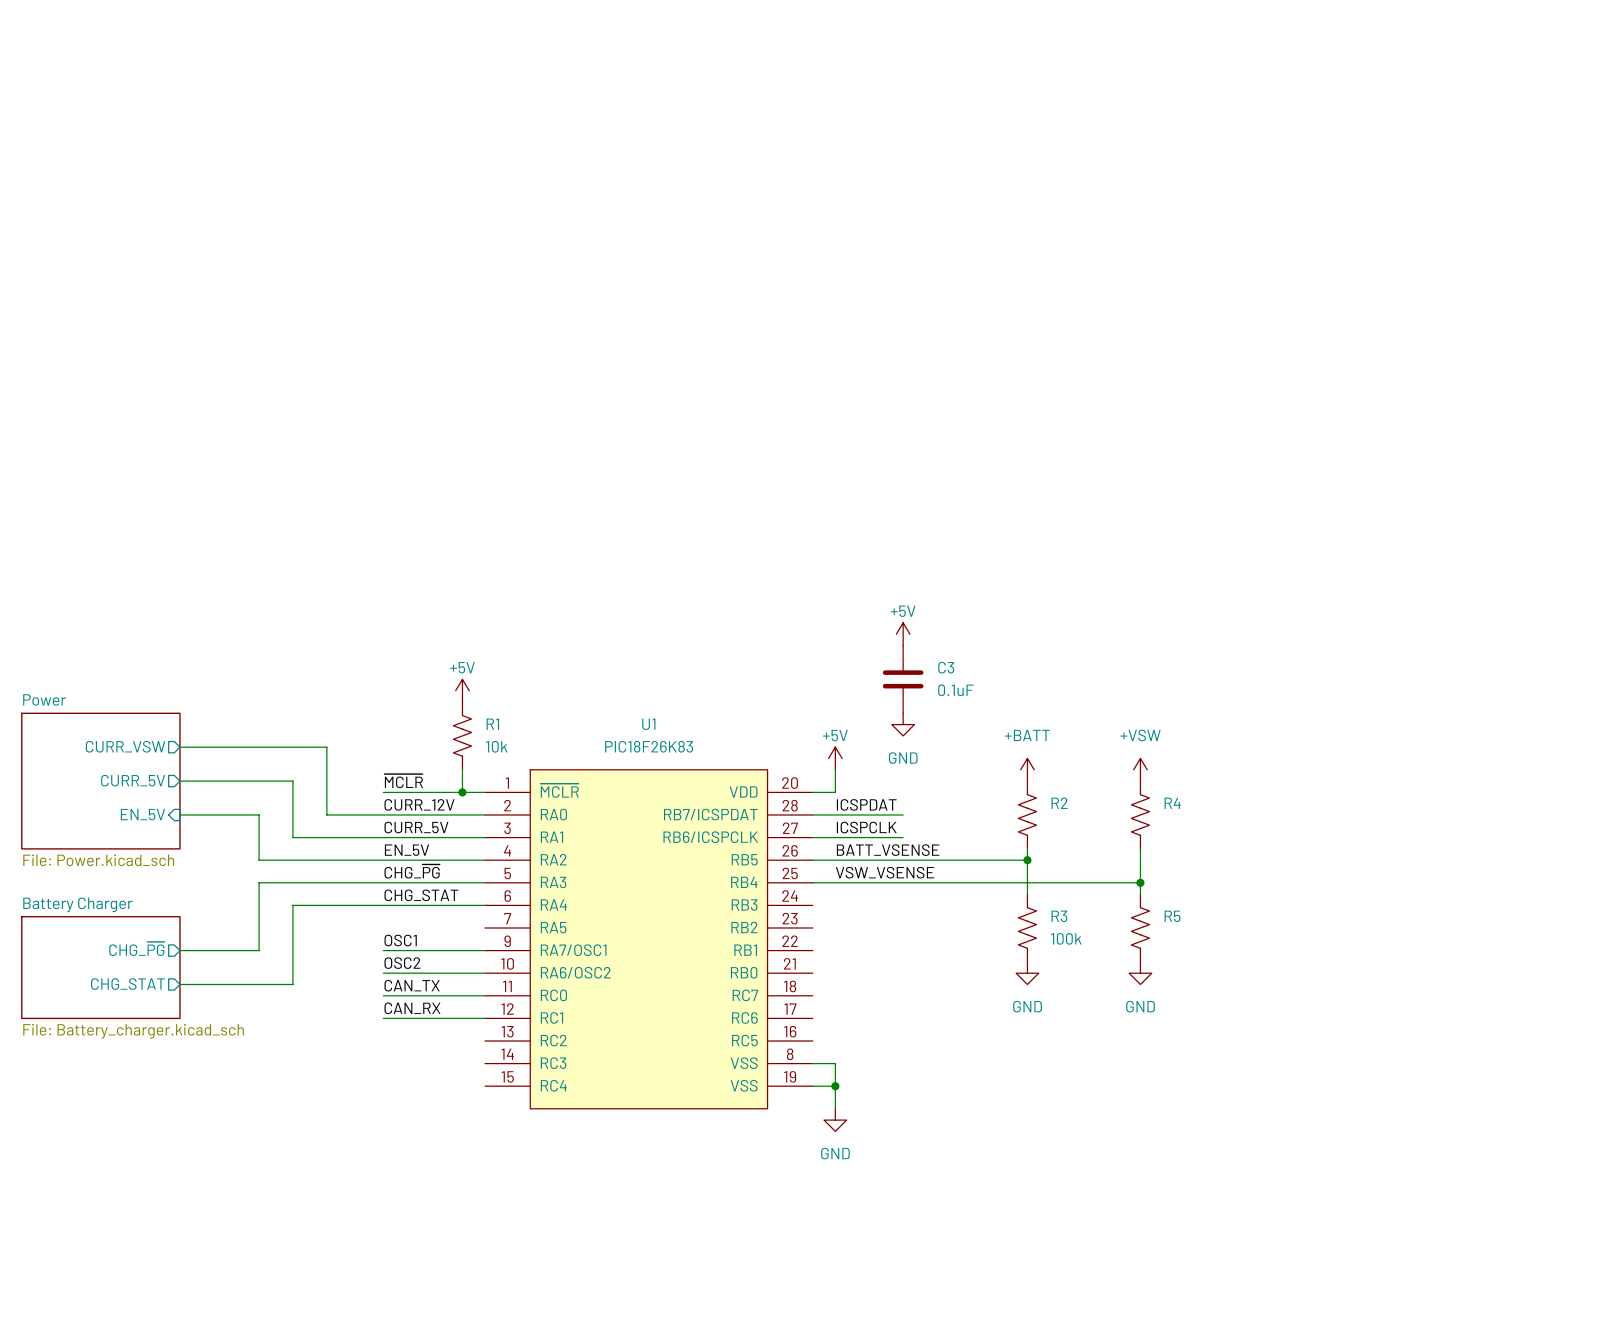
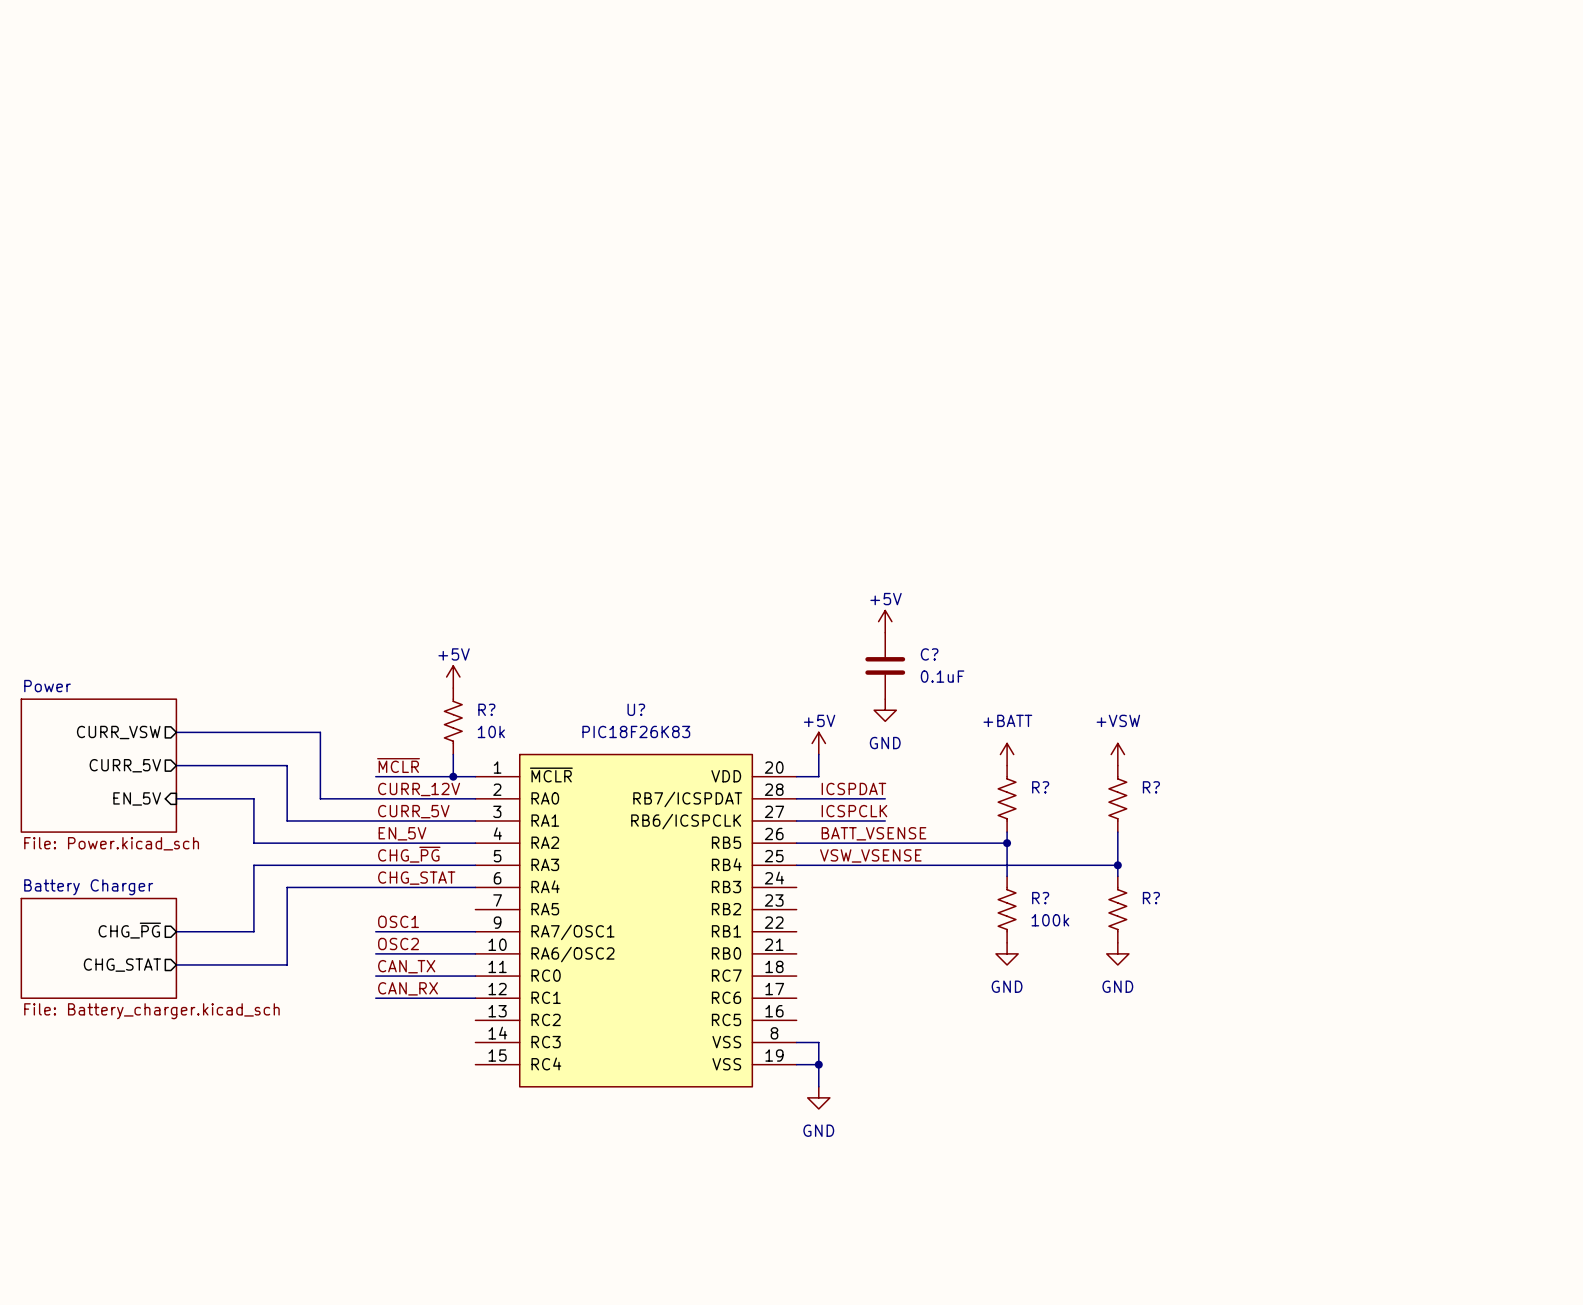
C3 name: C3 (946, 667) -> C? (929, 654)
R1 name: R1 (492, 724) -> R? (486, 709)
U1 name: U1 (648, 724) -> U? (636, 709)
R2 name: R2 (1059, 803) -> R? (1040, 787)
R4 name: R4 (1172, 803) -> R? (1151, 787)
R3 name: R3 (1059, 916) -> R? (1040, 898)
R5 name: R5 (1172, 916) -> R? (1151, 898)

